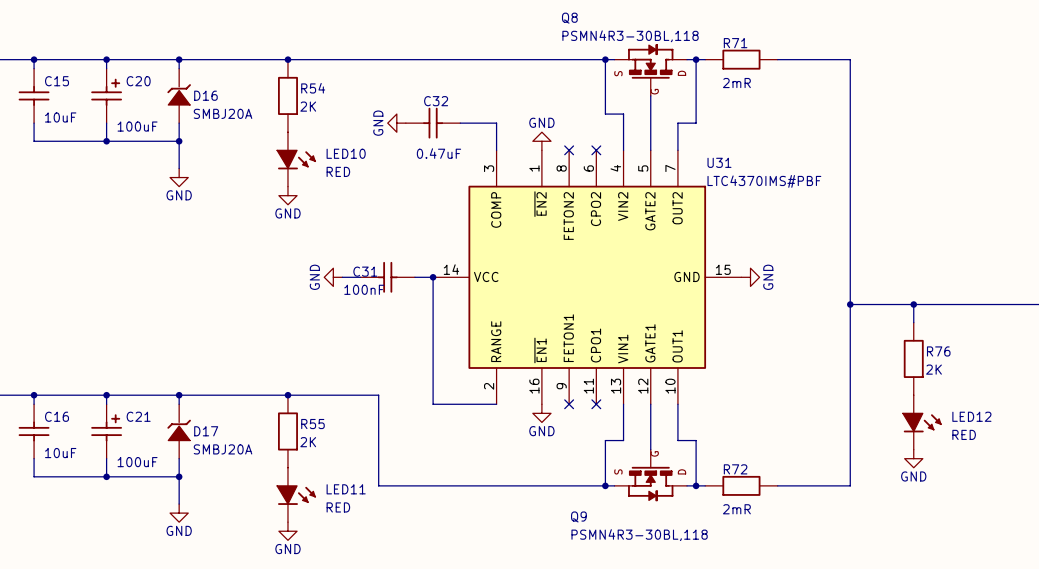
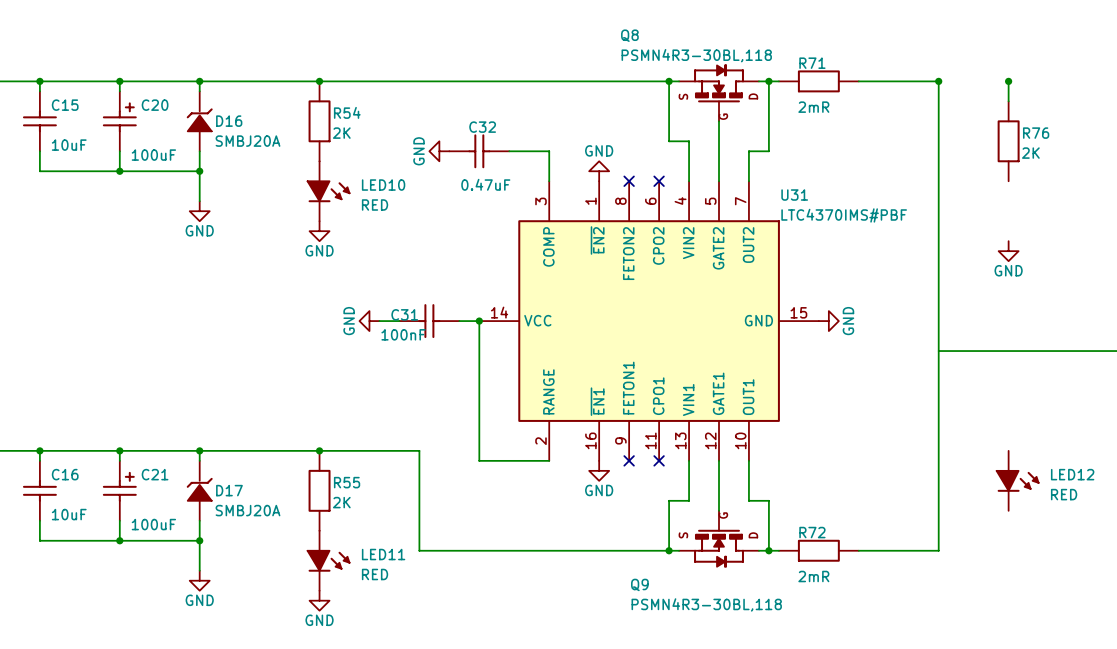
junction: none -> (938, 81)
wire: none -> (1008, 81) (1008, 101)
junction: none -> (1008, 81)
power symbol: none -> GND (1008, 251)
junction: (850, 304) -> none
wire: (913, 304) (913, 322) -> none
junction: (913, 304) -> none
R76 position: (913, 358) -> (1008, 141)
power symbol: GND (913, 458) -> none

